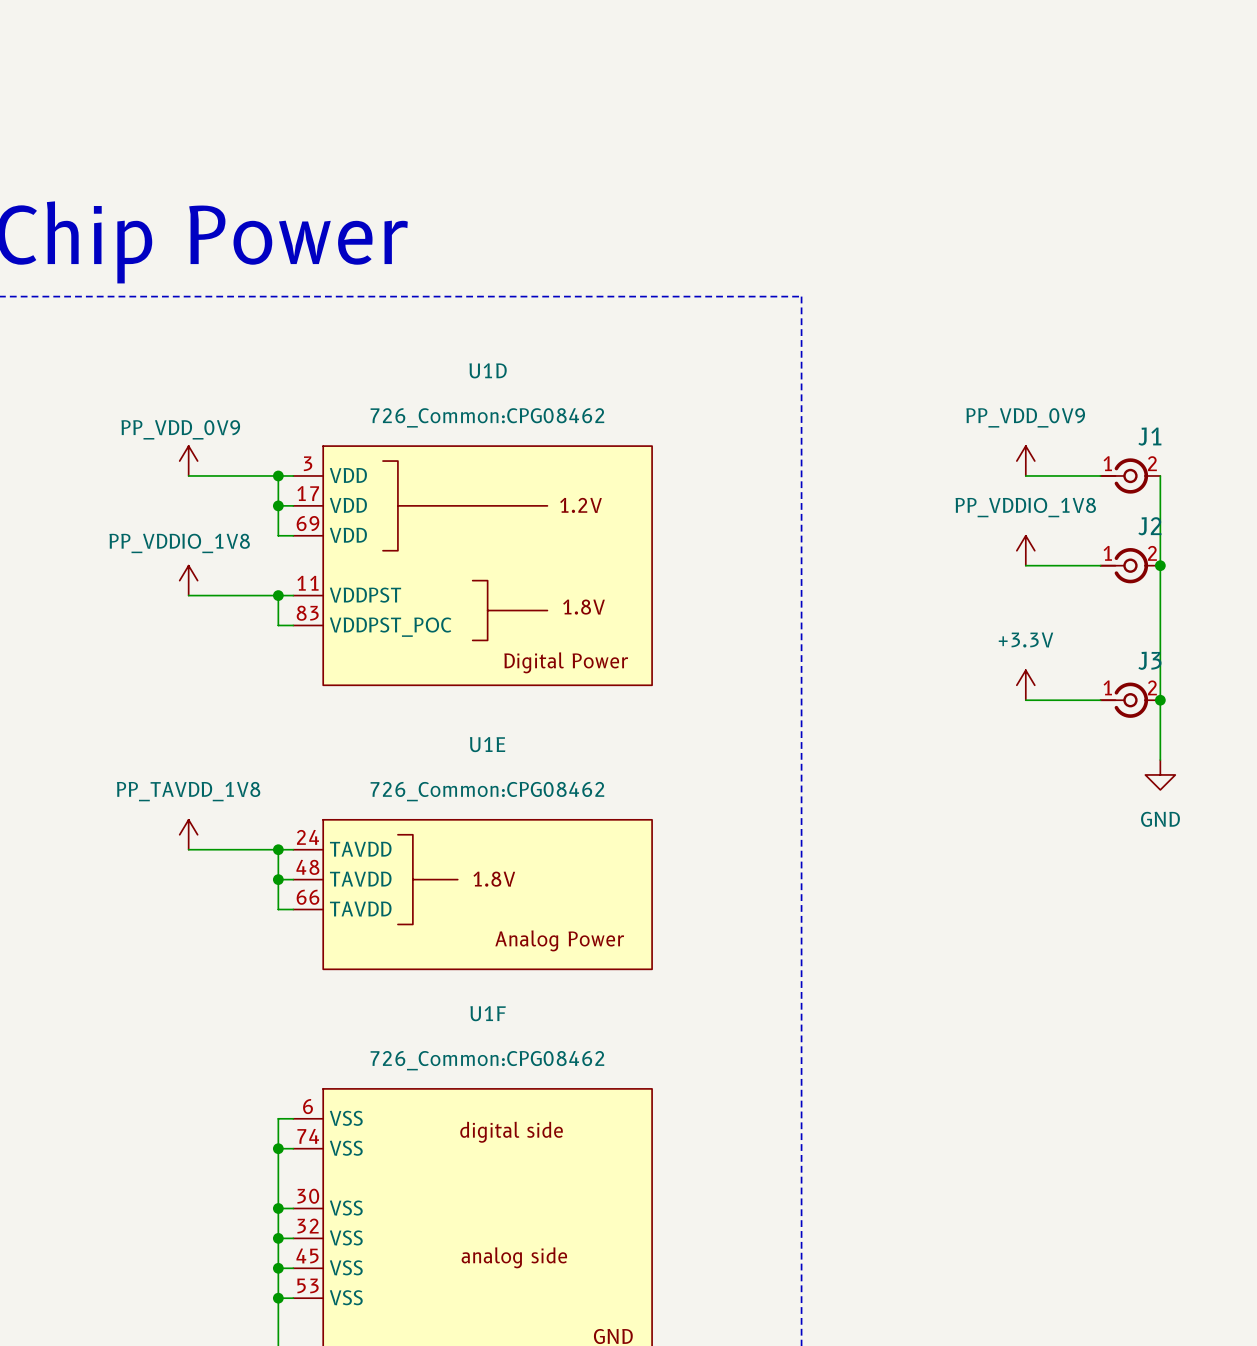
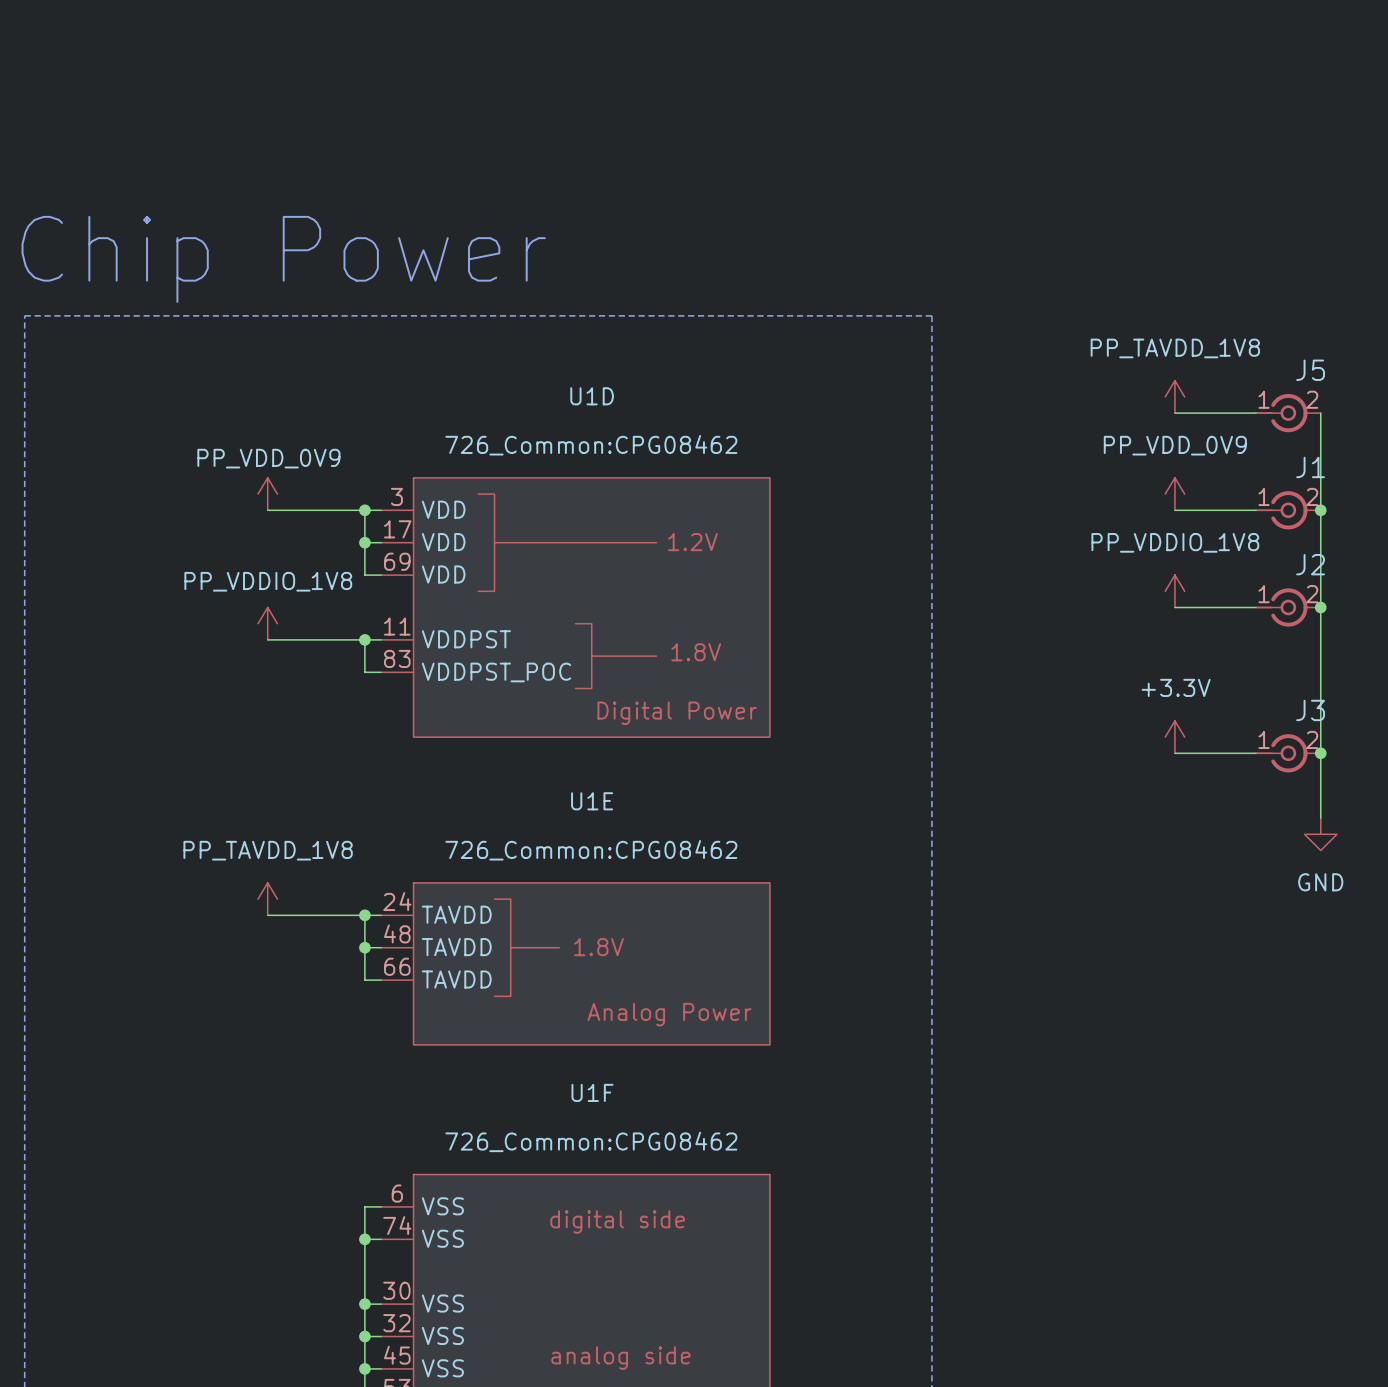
power symbol: none -> PP_TAVDD_1V8 (1174, 396)
wire: none -> (1174, 413) (1255, 413)
J5: none -> (1288, 413)
wire: none -> (1320, 413) (1320, 510)
junction: none -> (1320, 510)

